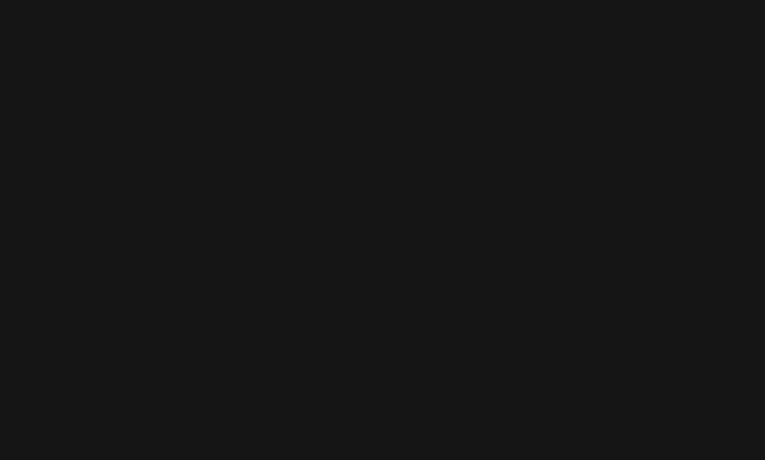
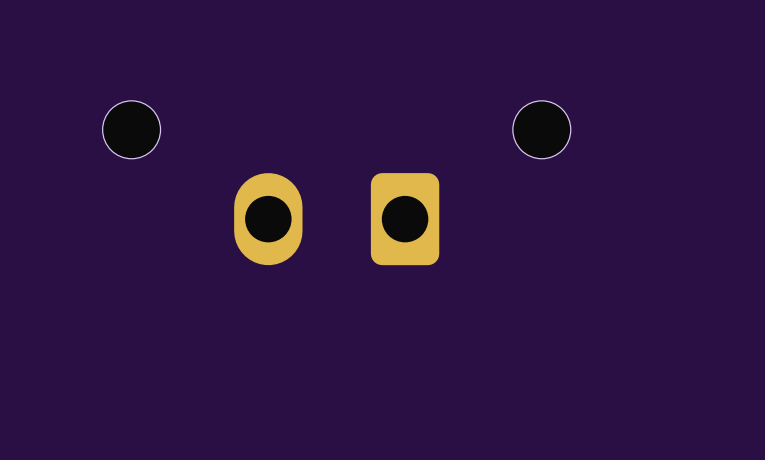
part: none -> (336, 183)

